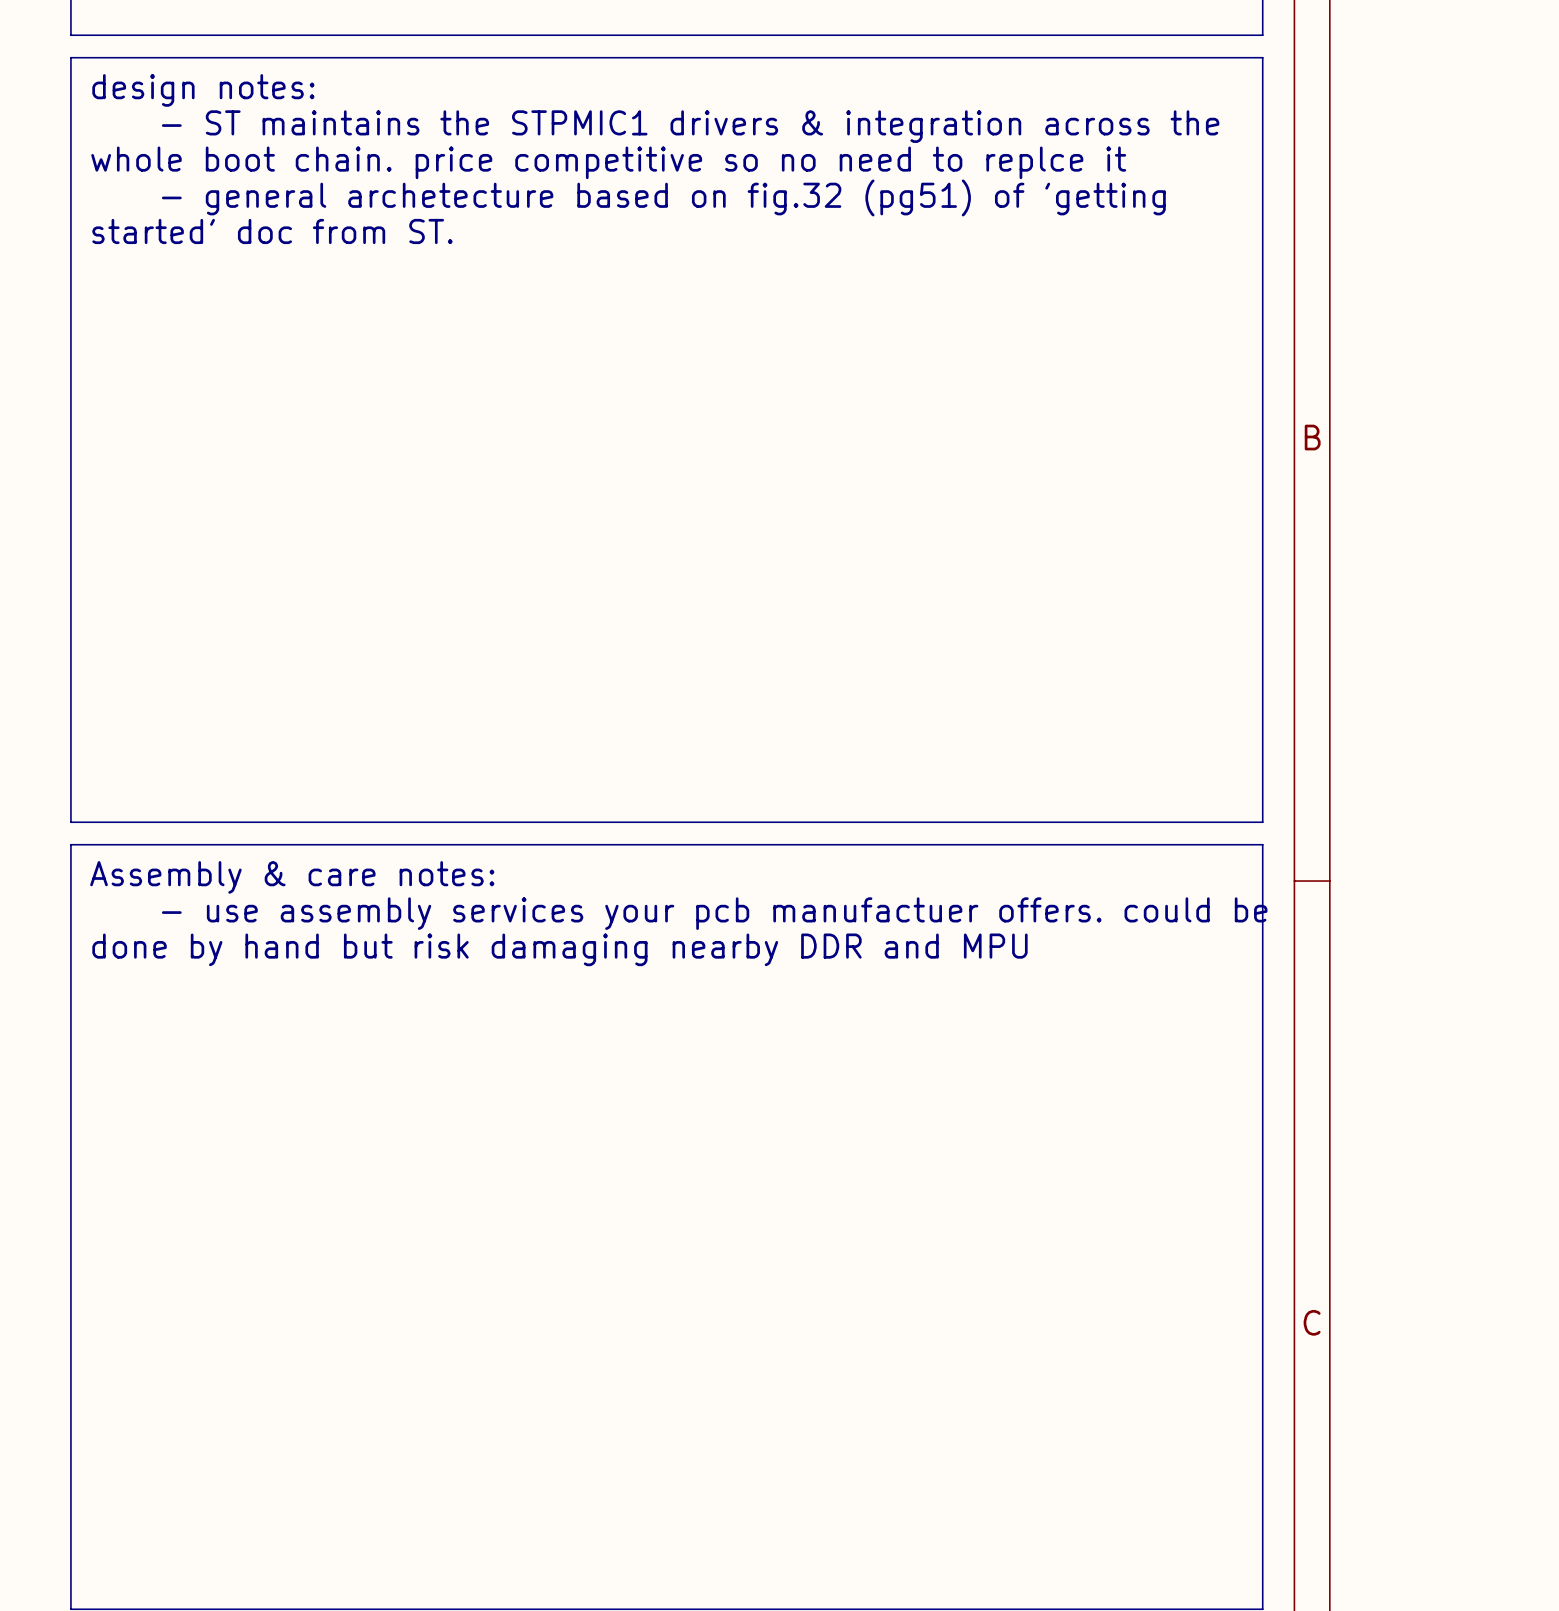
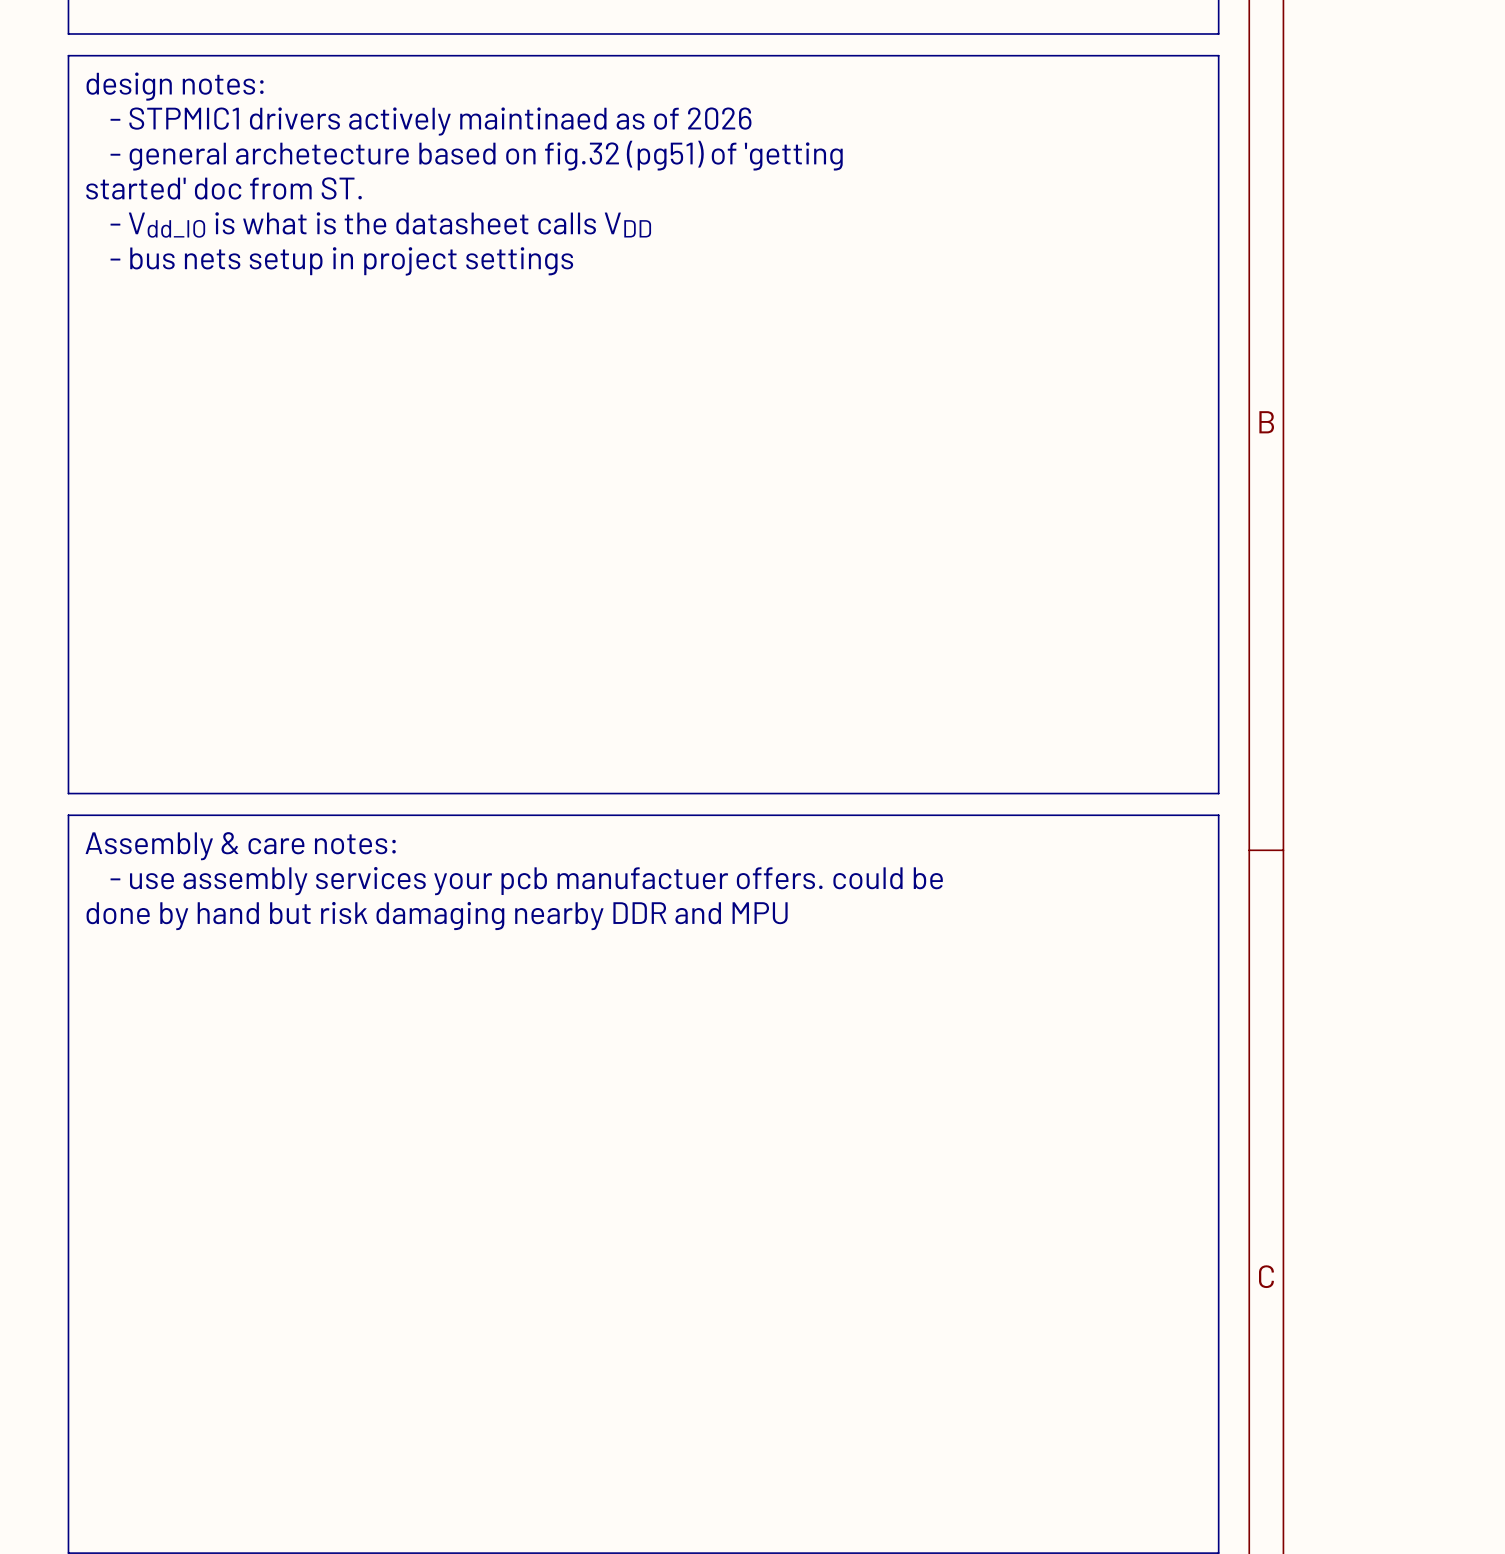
text: - ST maintains the STPMIC1 drivers & integration across the (690, 126) -> - STPMIC1 drivers actively maintinaed as of 2026 (431, 121)
text: whole boot chain. price competitive so no need to replce it (608, 162) -> - general archetecture based on fig.32 (pg51) of 'getting (476, 155)
text: - general archetecture based on fig.32 (pg51) of 'getting (663, 197) -> started' doc from ST. (224, 188)
text: started' doc from ST. (272, 231) -> - Vdd_IO is what is the datasheet calls VDD (380, 224)
text: none -> - bus nets setup in project settings (341, 261)

